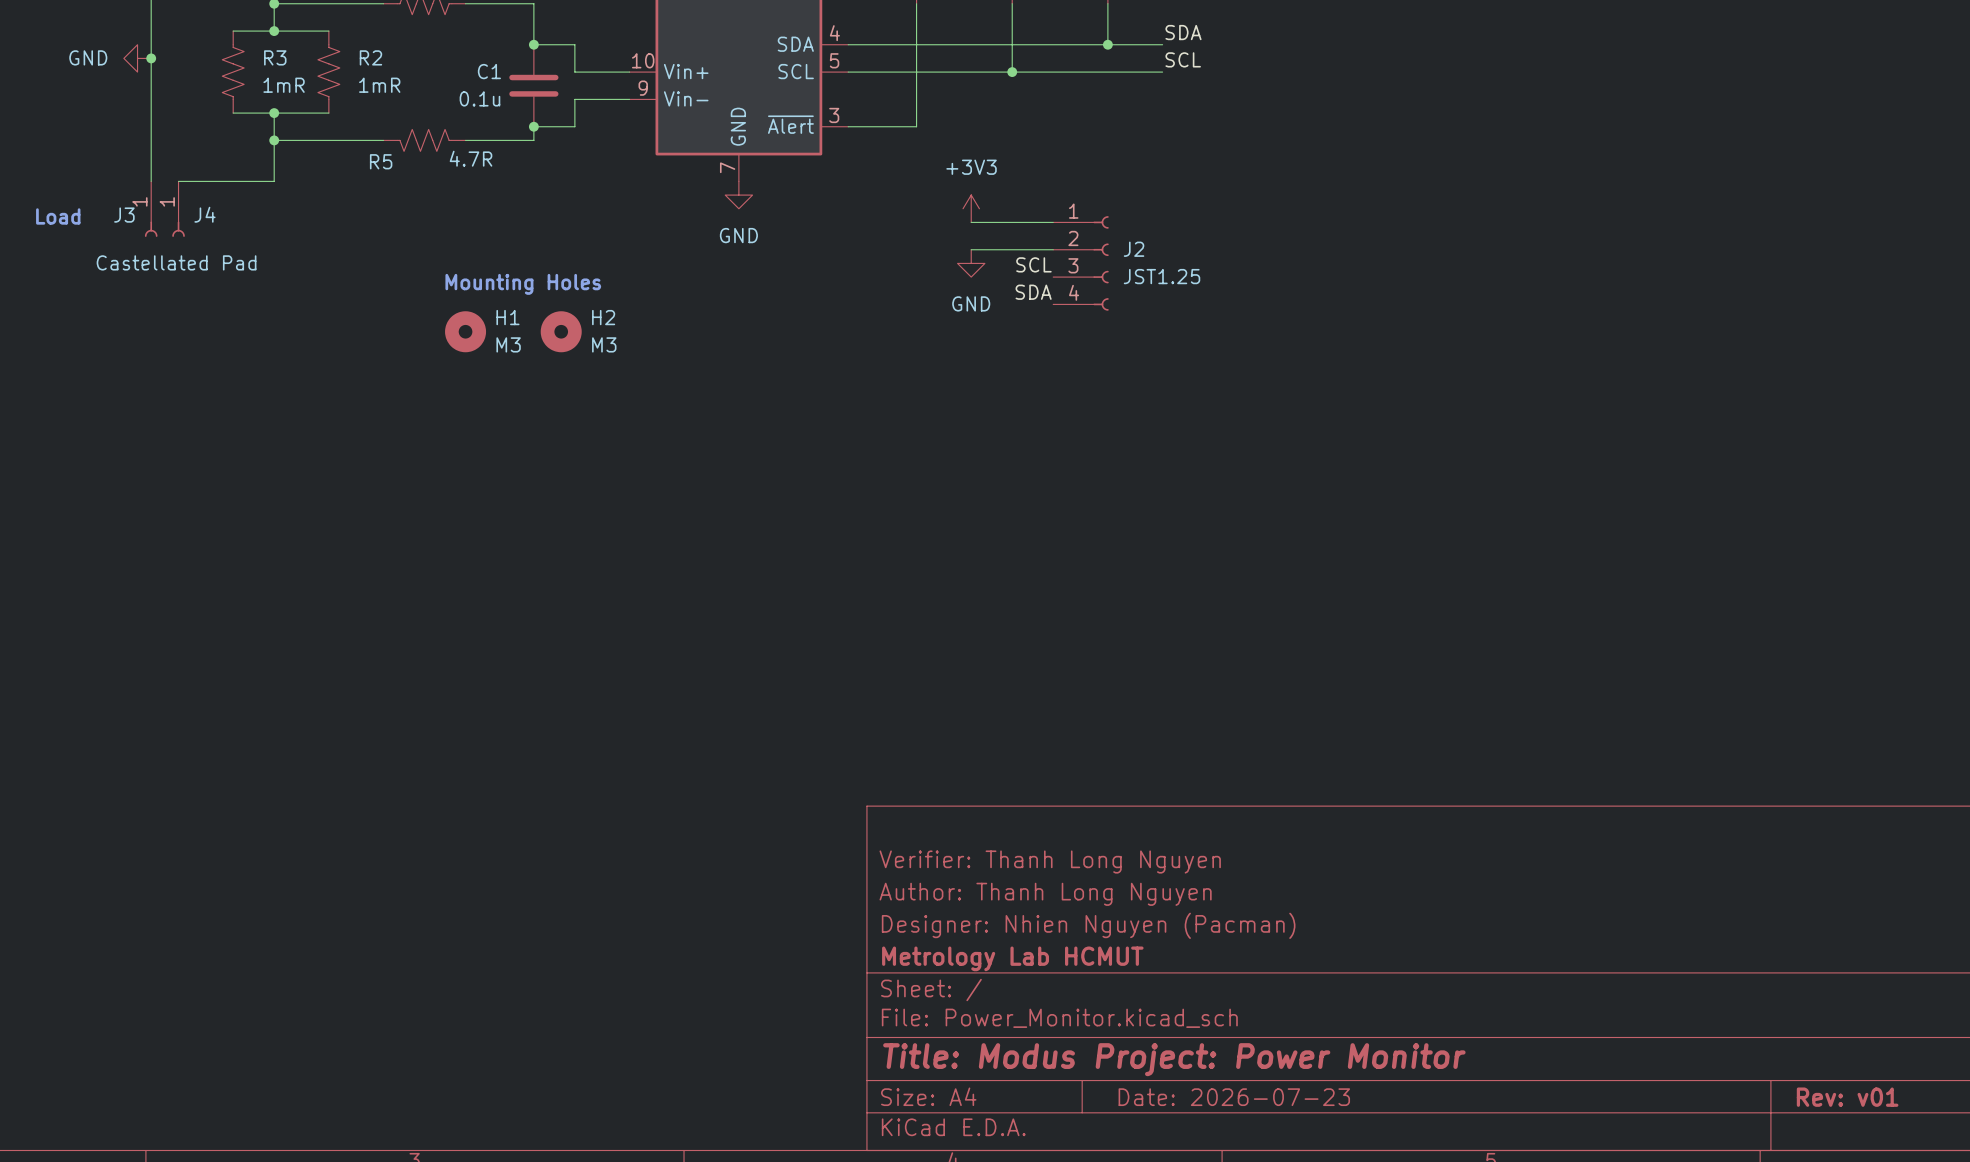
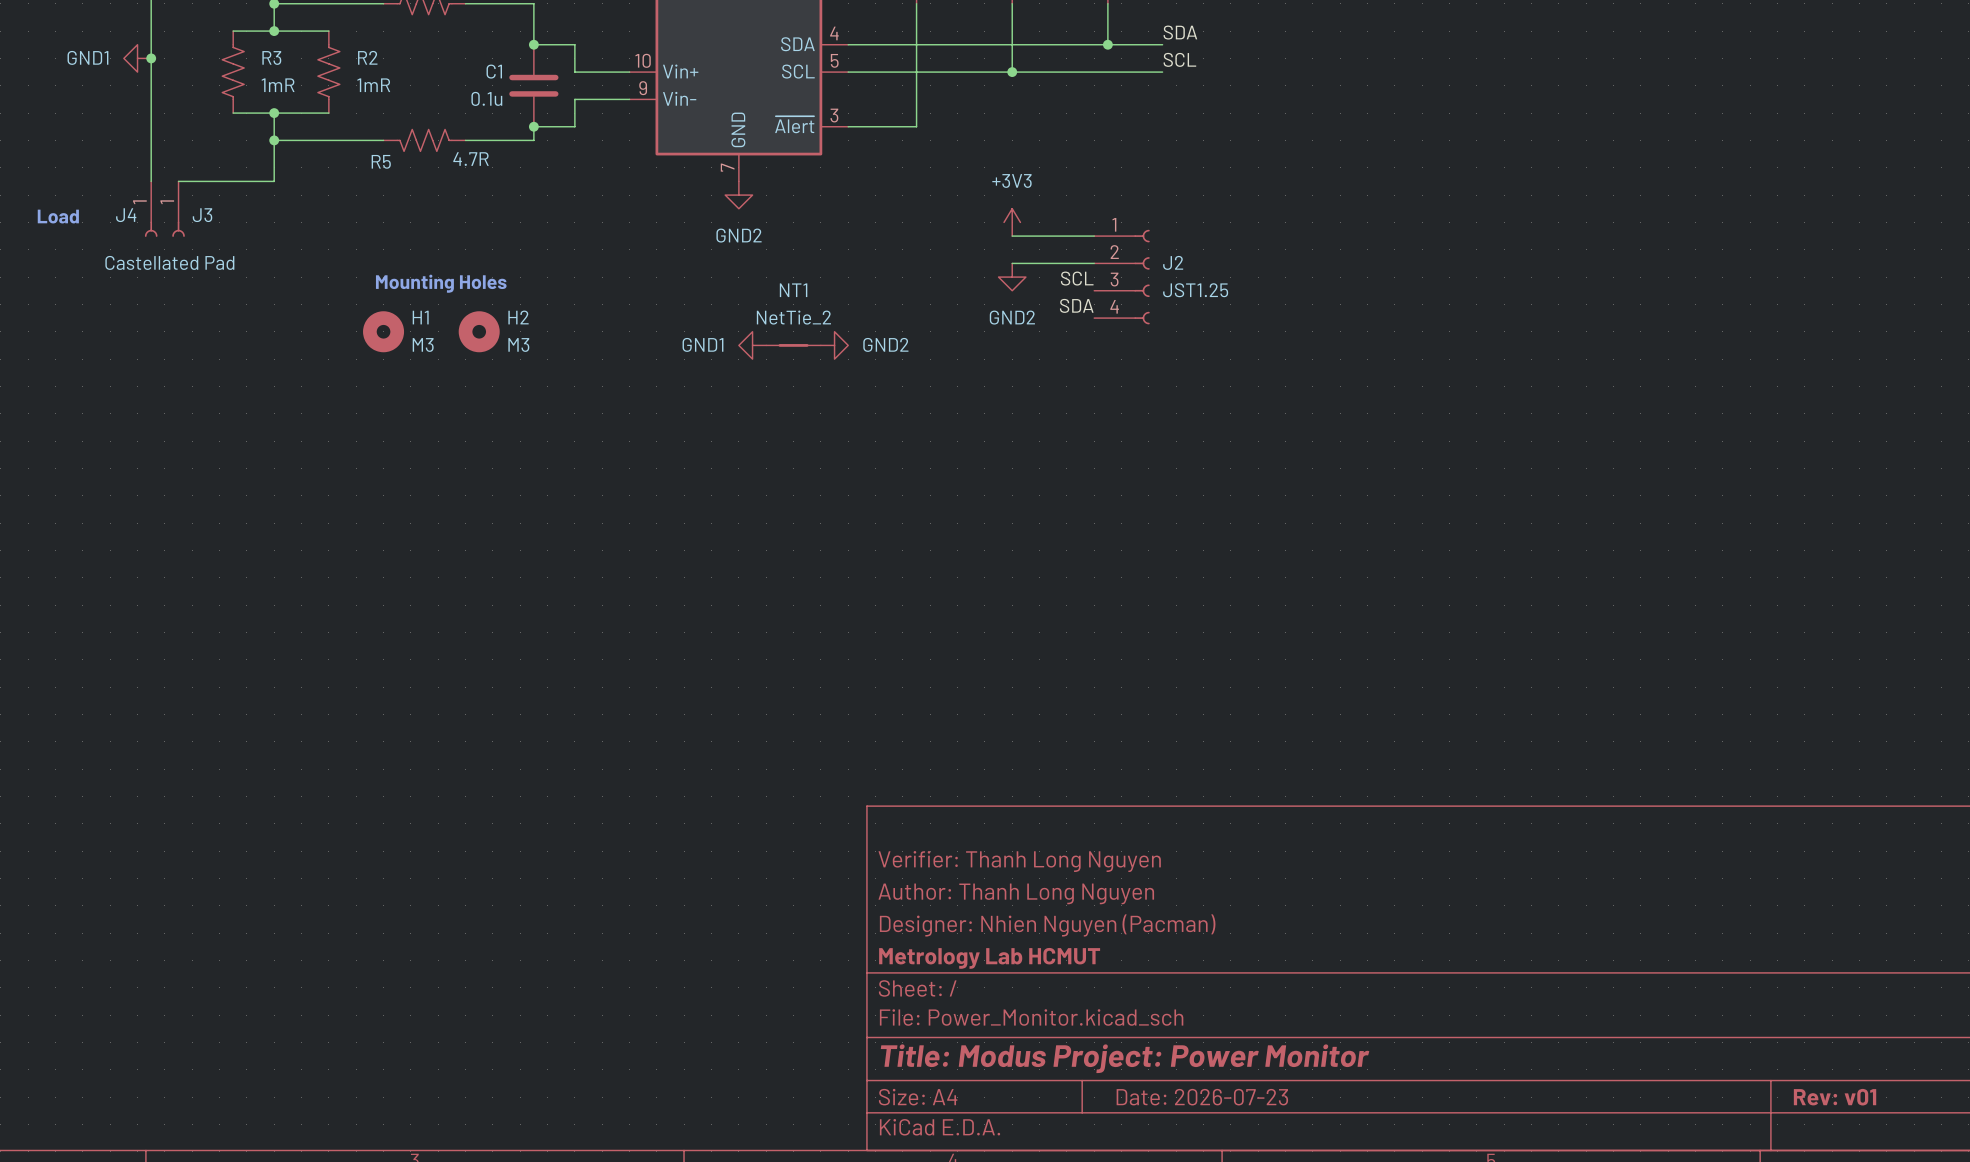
power symbol: GND (137, 58) -> GND1 (137, 58)
power symbol: GND (738, 195) -> GND2 (738, 195)
power symbol position: +3V3 (971, 208) -> +3V3 (1012, 222)
J4 name: J4 (204, 214) -> J3 (202, 215)
J3 name: J3 (124, 215) -> J4 (126, 215)
wire: (971, 222) (1053, 222) -> (1012, 236) (1094, 236)
wire: (971, 249) (1053, 249) -> (1012, 263) (1094, 263)
J3 value: none -> Castellated Pad (169, 262)
J4 value: Castellated Pad (176, 262) -> none
power symbol: GND (971, 263) -> none
J2 position: (1080, 263) -> (1121, 277)
label position: SCL (1033, 264) -> SCL (1077, 278)
power symbol: none -> GND2 (1012, 277)
text position: Mounting Holes (523, 284) -> Mounting Holes (441, 283)
label position: SDA (1033, 292) -> SDA (1076, 305)
H1 position: (465, 331) -> (383, 331)
H2 position: (561, 331) -> (479, 331)
power symbol: none -> GND1 (752, 345)
NT1: none -> NetTie_2 (793, 345)
power symbol: none -> GND2 (834, 345)

